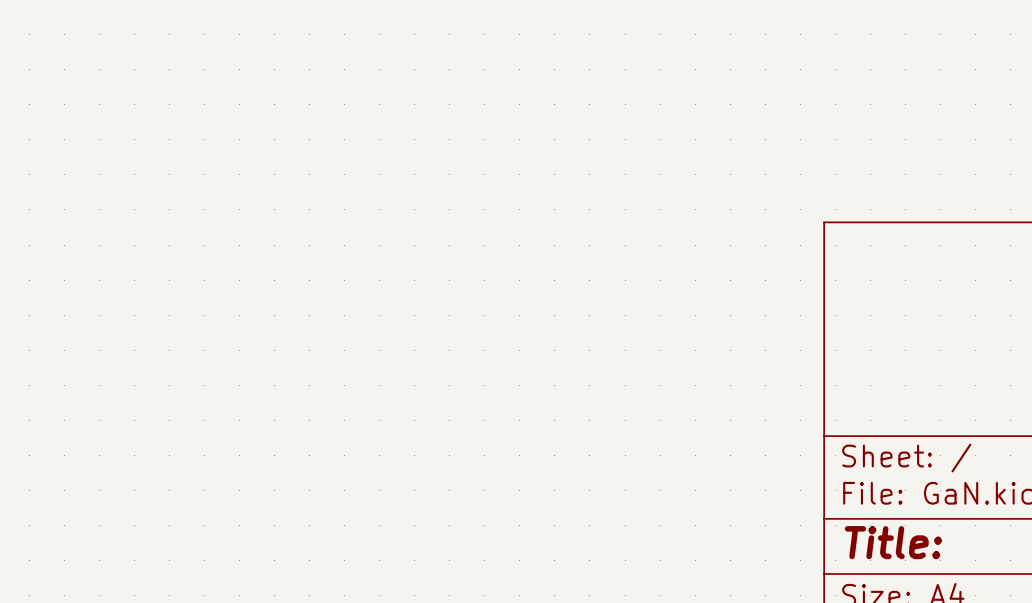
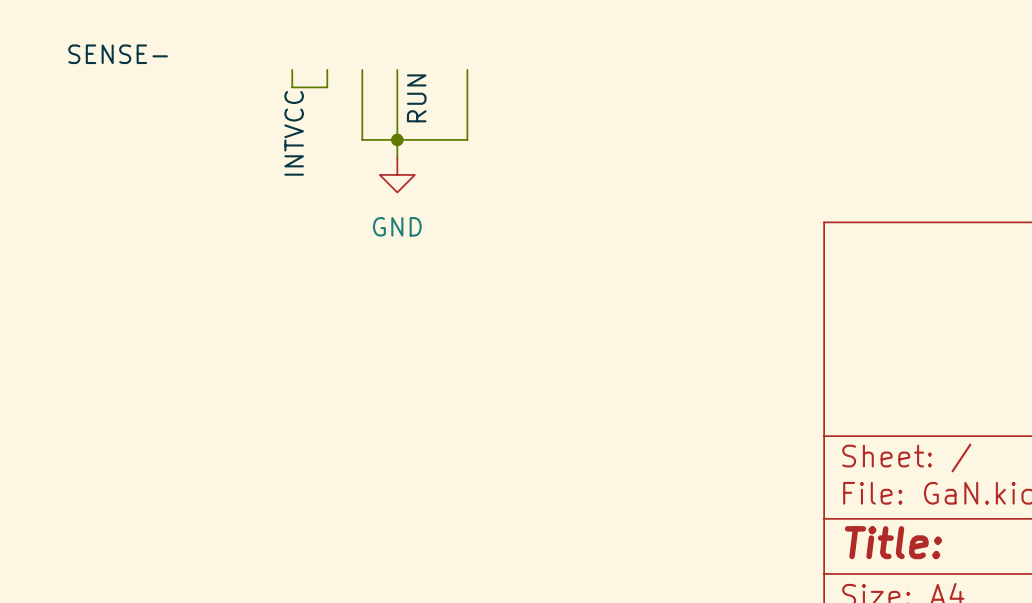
label: none -> SENSE- (118, 54)
wire: none -> (292, 69) (292, 87) (327, 87) (327, 69)
wire: none -> (362, 69) (362, 139) (467, 139) (467, 69)
wire: none -> (397, 69) (397, 157)
label: none -> RUN (416, 98)
label: none -> INTVCC (294, 133)
junction: none -> (397, 139)
power symbol: none -> GND (397, 174)

